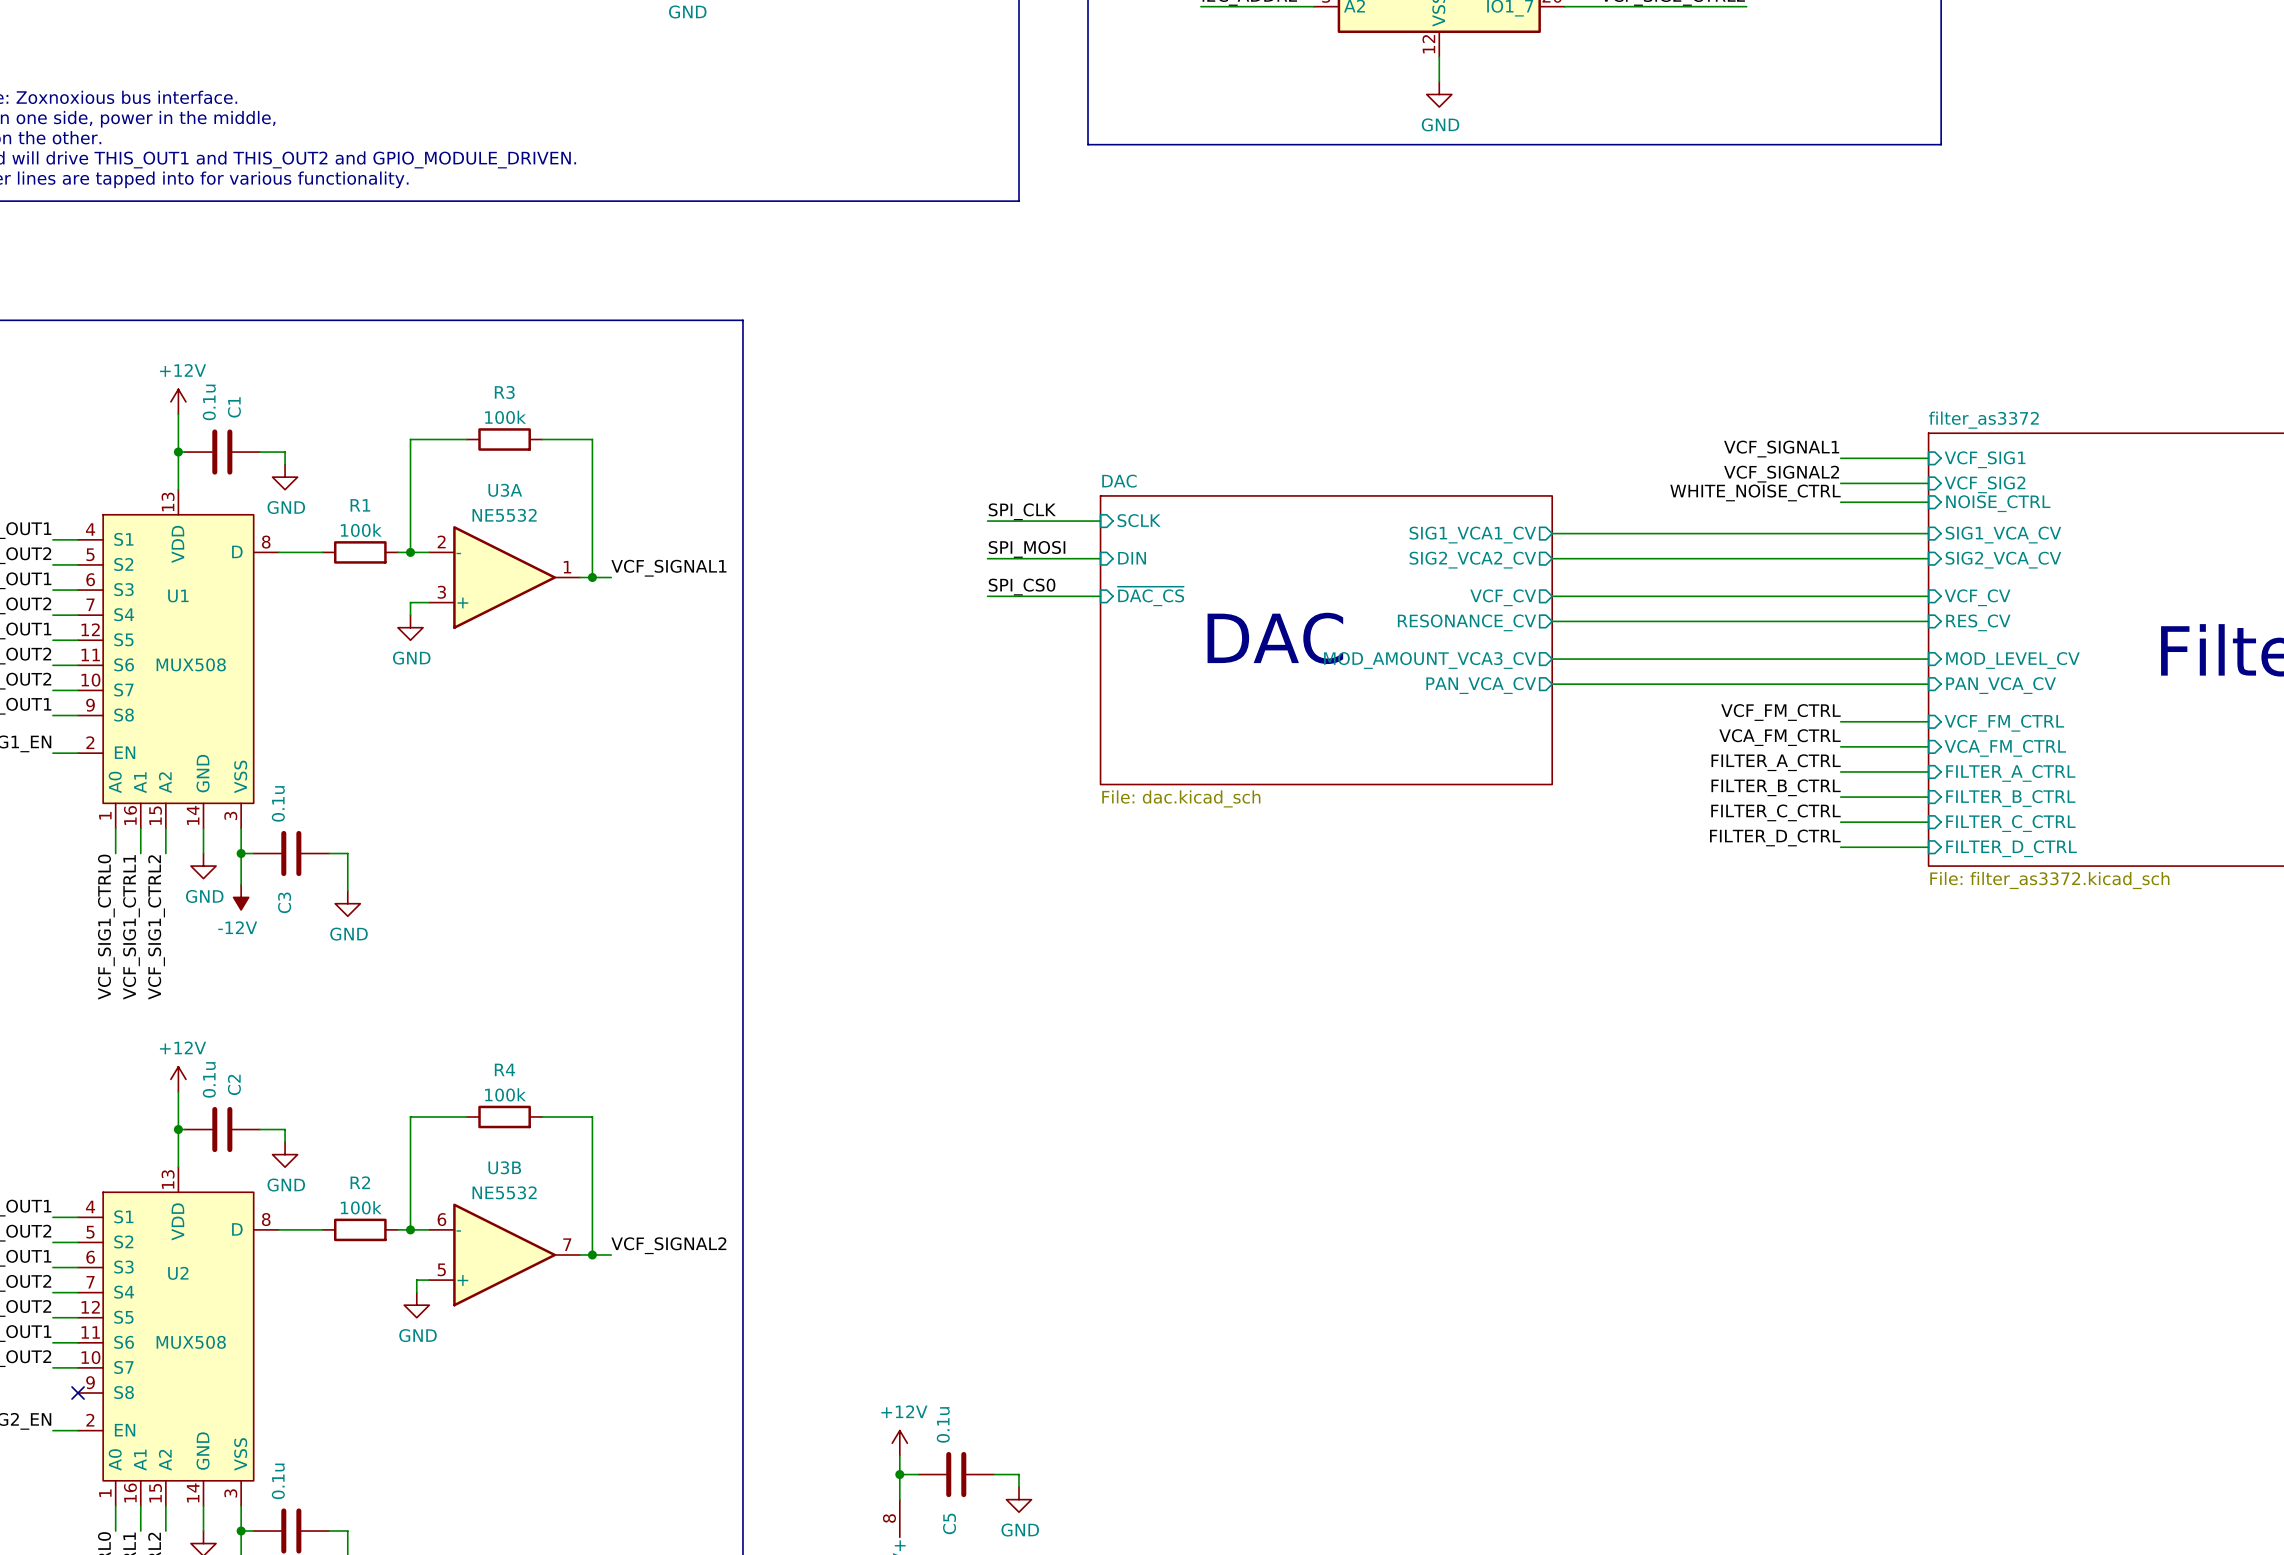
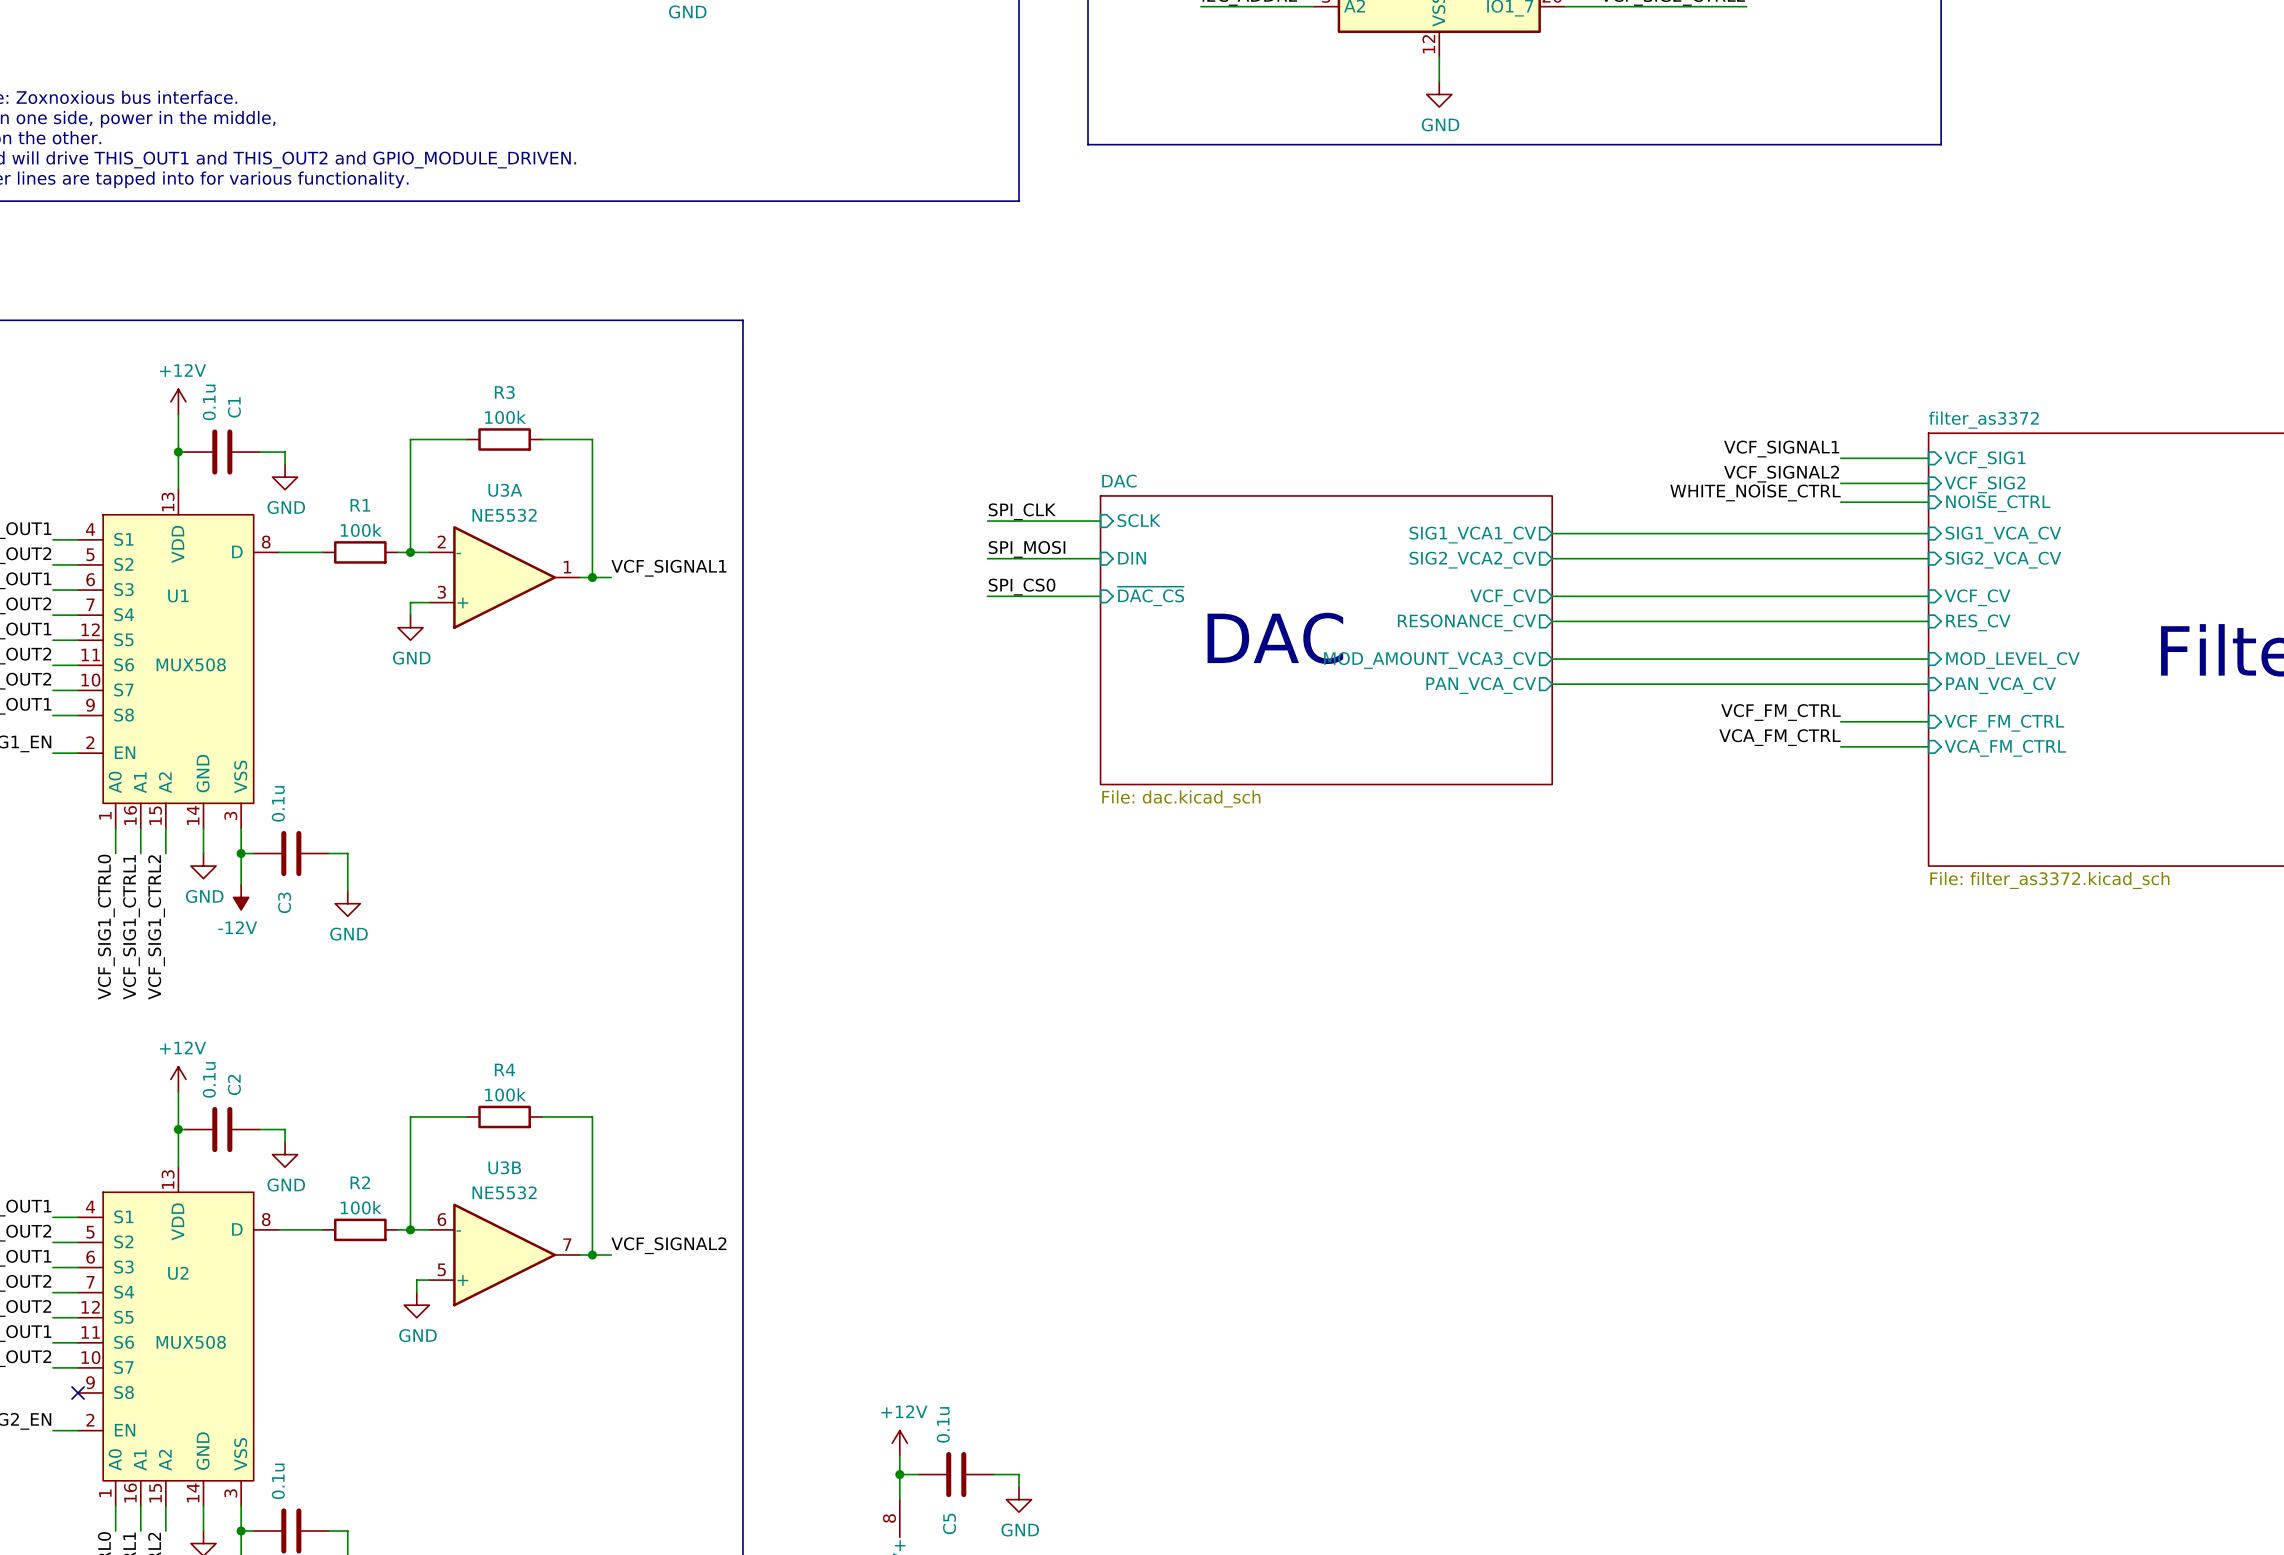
label: FILTER_A_CTRL (1776, 762) -> none
wire: (1840, 771) (1928, 771) -> none
sheet pin: FILTER_A_CTRL (2010, 773) -> none
label: FILTER_B_CTRL (1776, 787) -> none
wire: (1840, 797) (1928, 797) -> none
sheet pin: FILTER_B_CTRL (2010, 798) -> none
label: FILTER_C_CTRL (1775, 812) -> none
wire: (1840, 822) (1928, 822) -> none
sheet pin: FILTER_C_CTRL (2010, 823) -> none
label: FILTER_D_CTRL (1775, 837) -> none
wire: (1840, 847) (1928, 847) -> none
sheet pin: FILTER_D_CTRL (2011, 848) -> none

